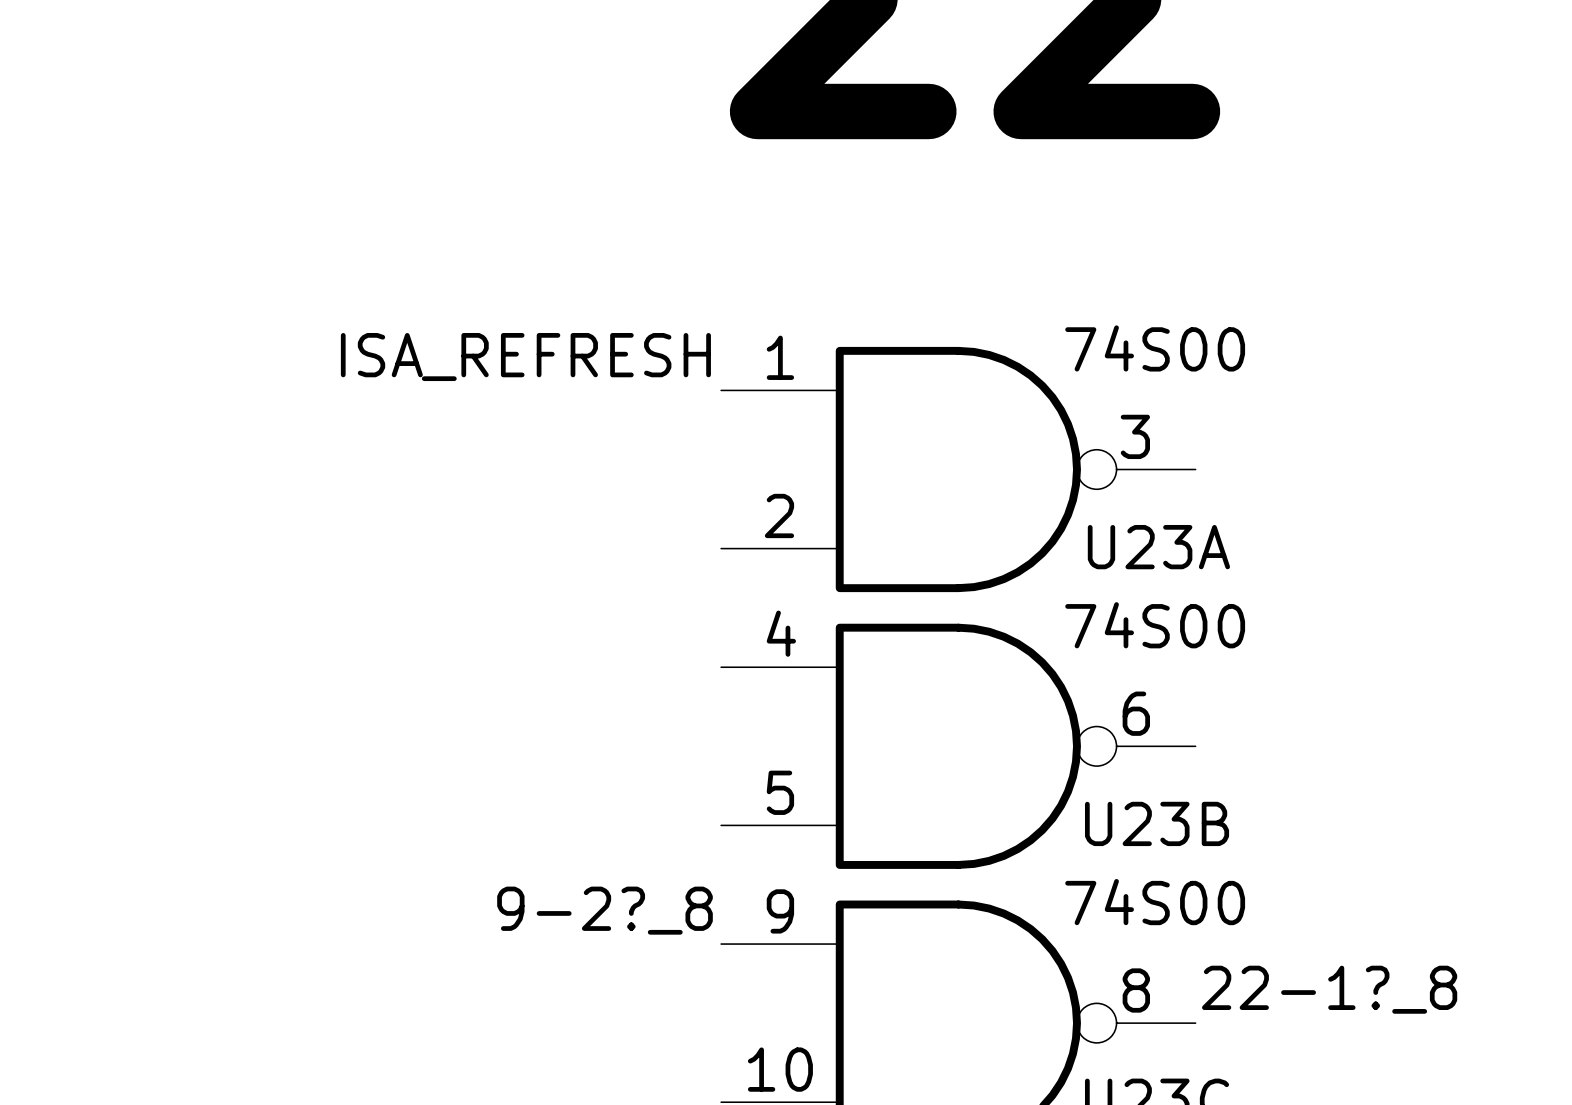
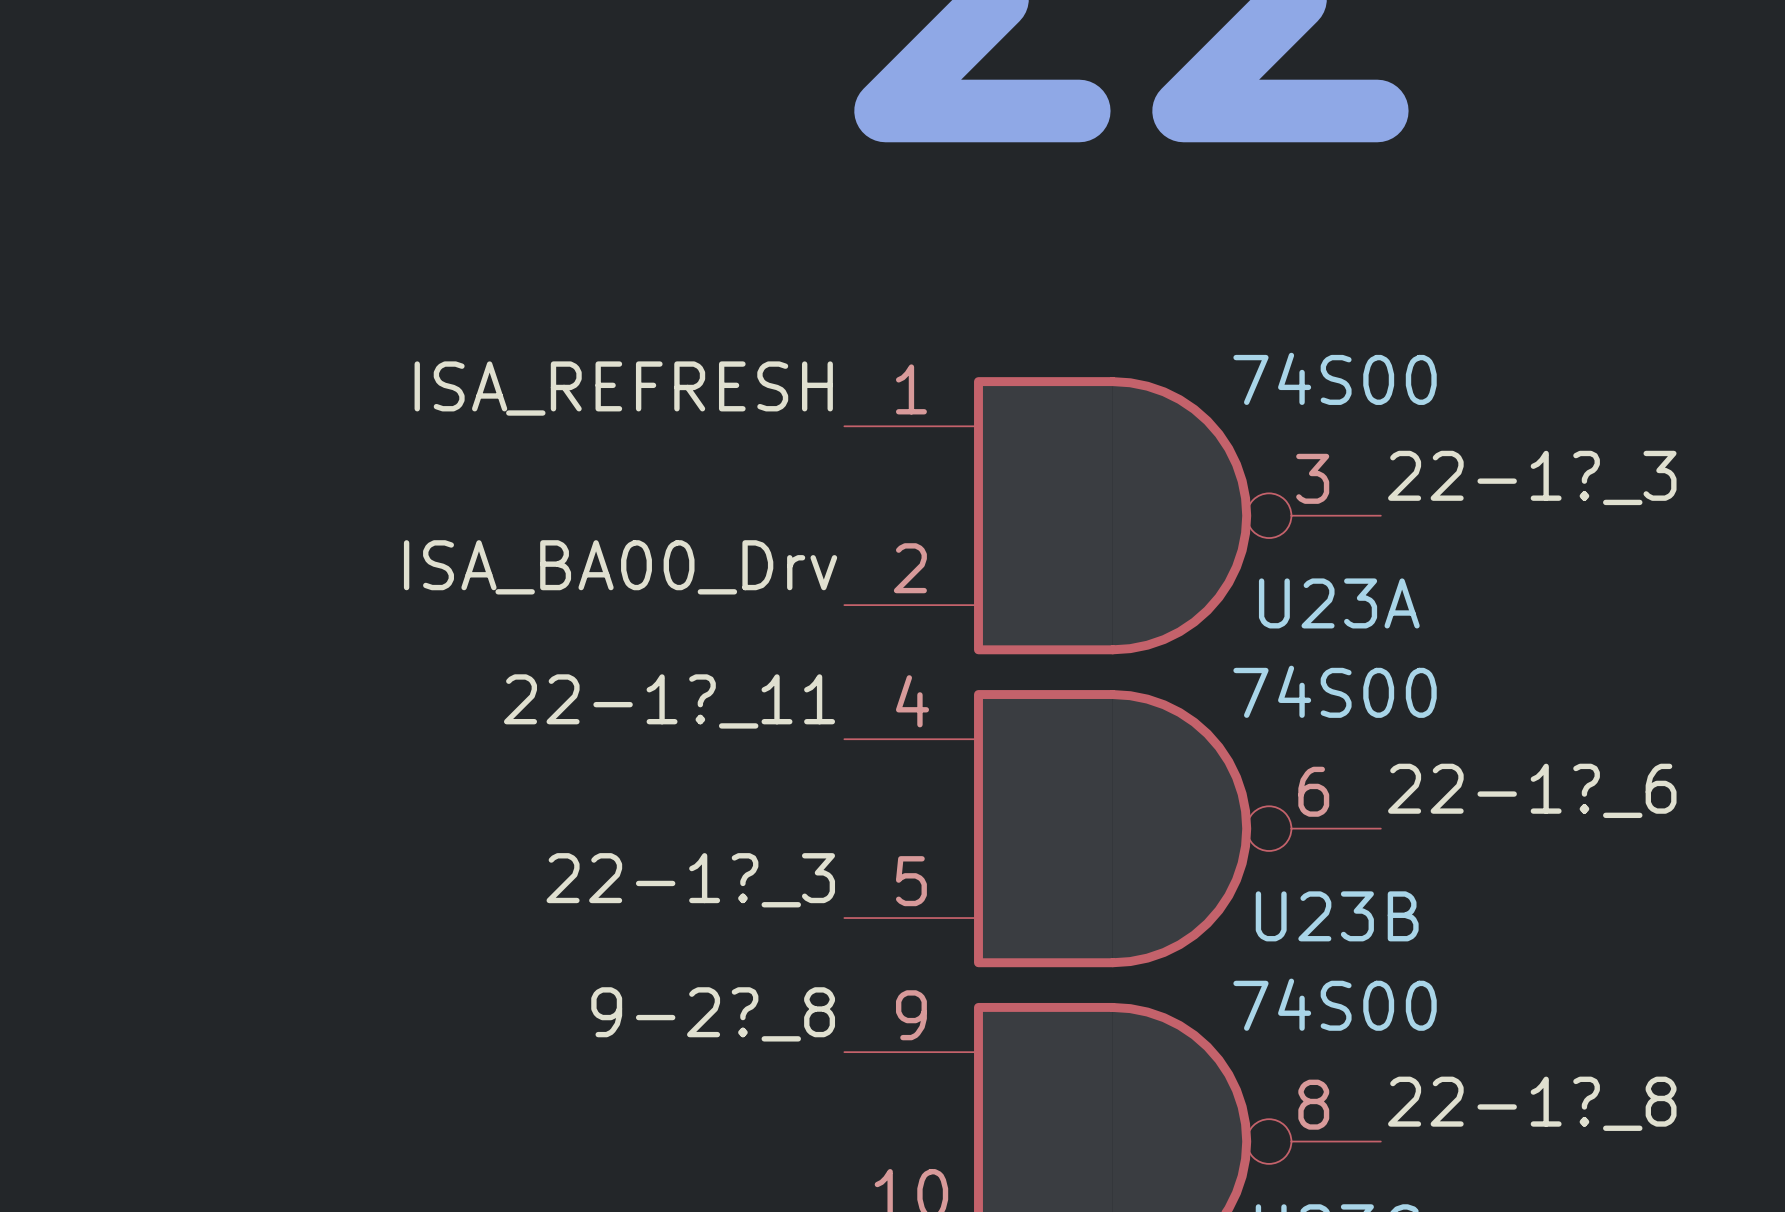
label: none -> 22-1?_3 (1532, 477)
label: none -> ISA_BA00_Drv (620, 567)
label: none -> 22-1?_11 (669, 701)
label: none -> 22-1?_6 (1532, 790)
label: none -> 22-1?_3 (690, 880)

